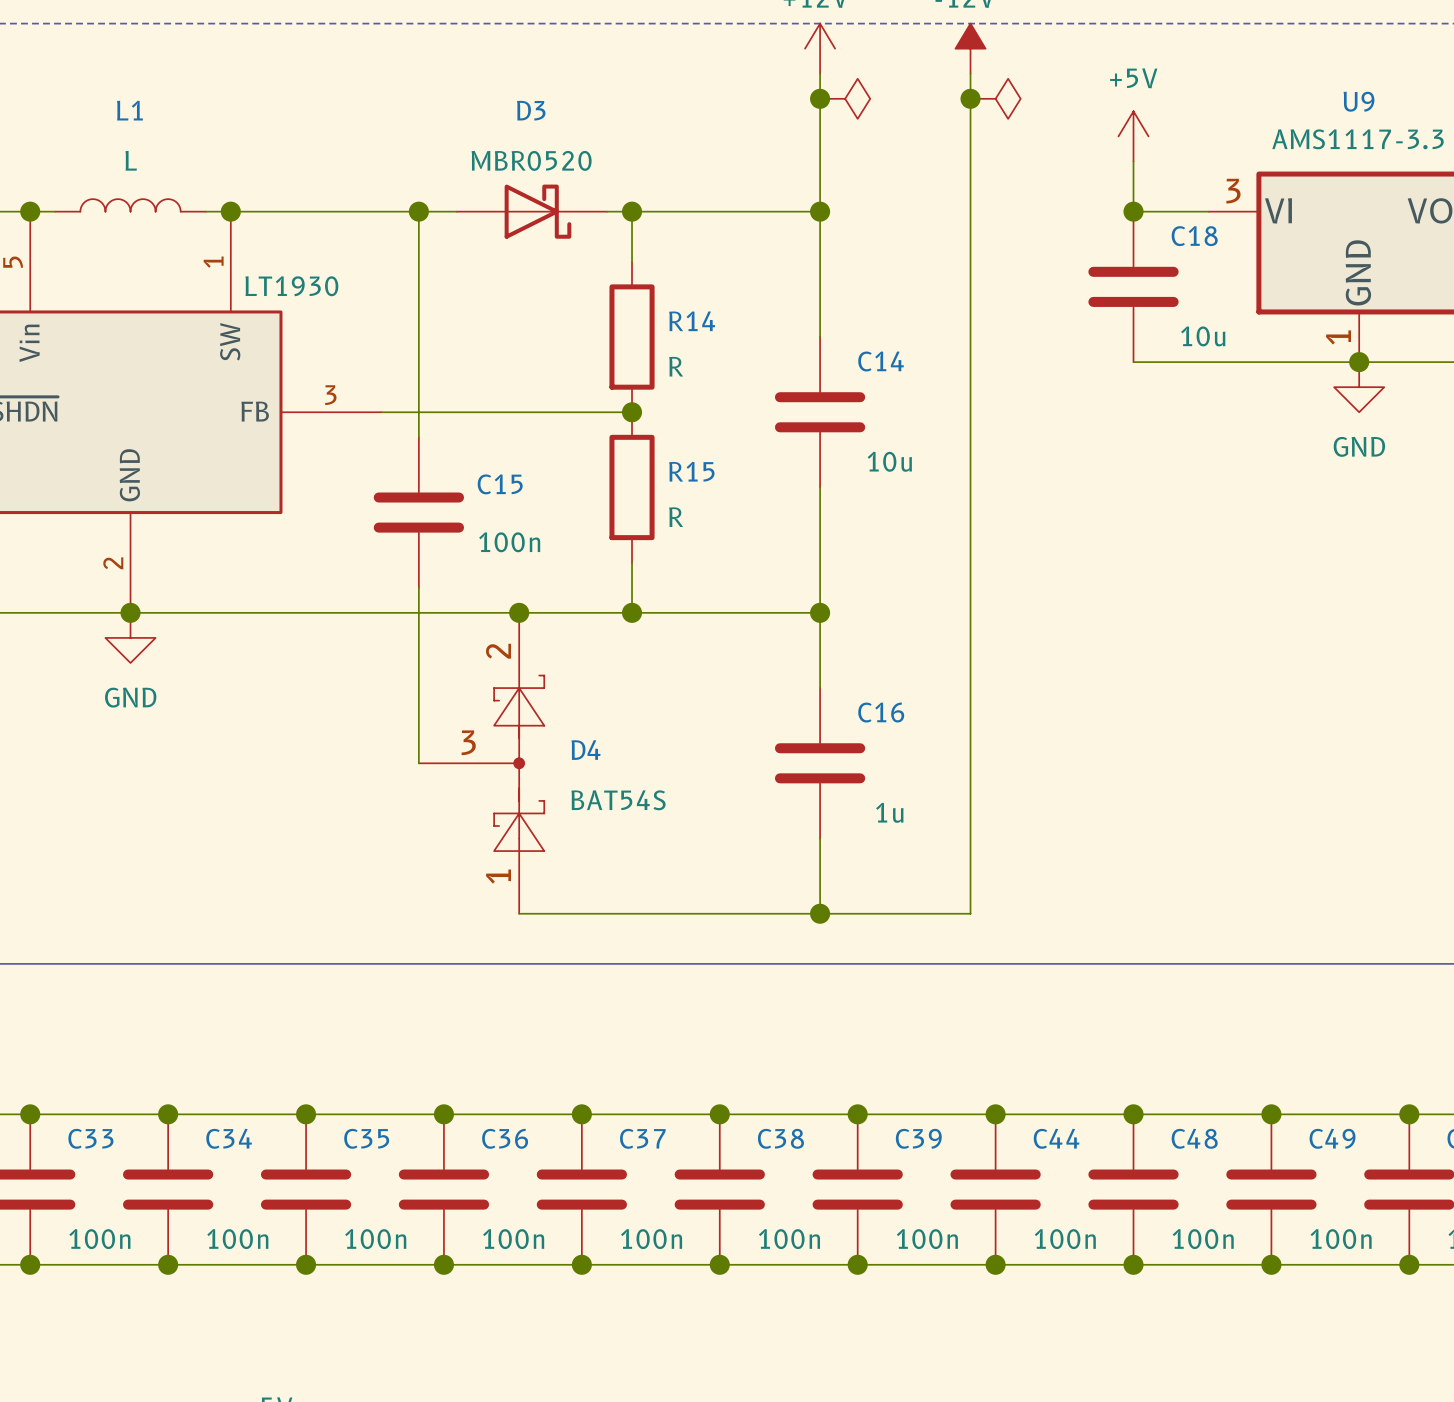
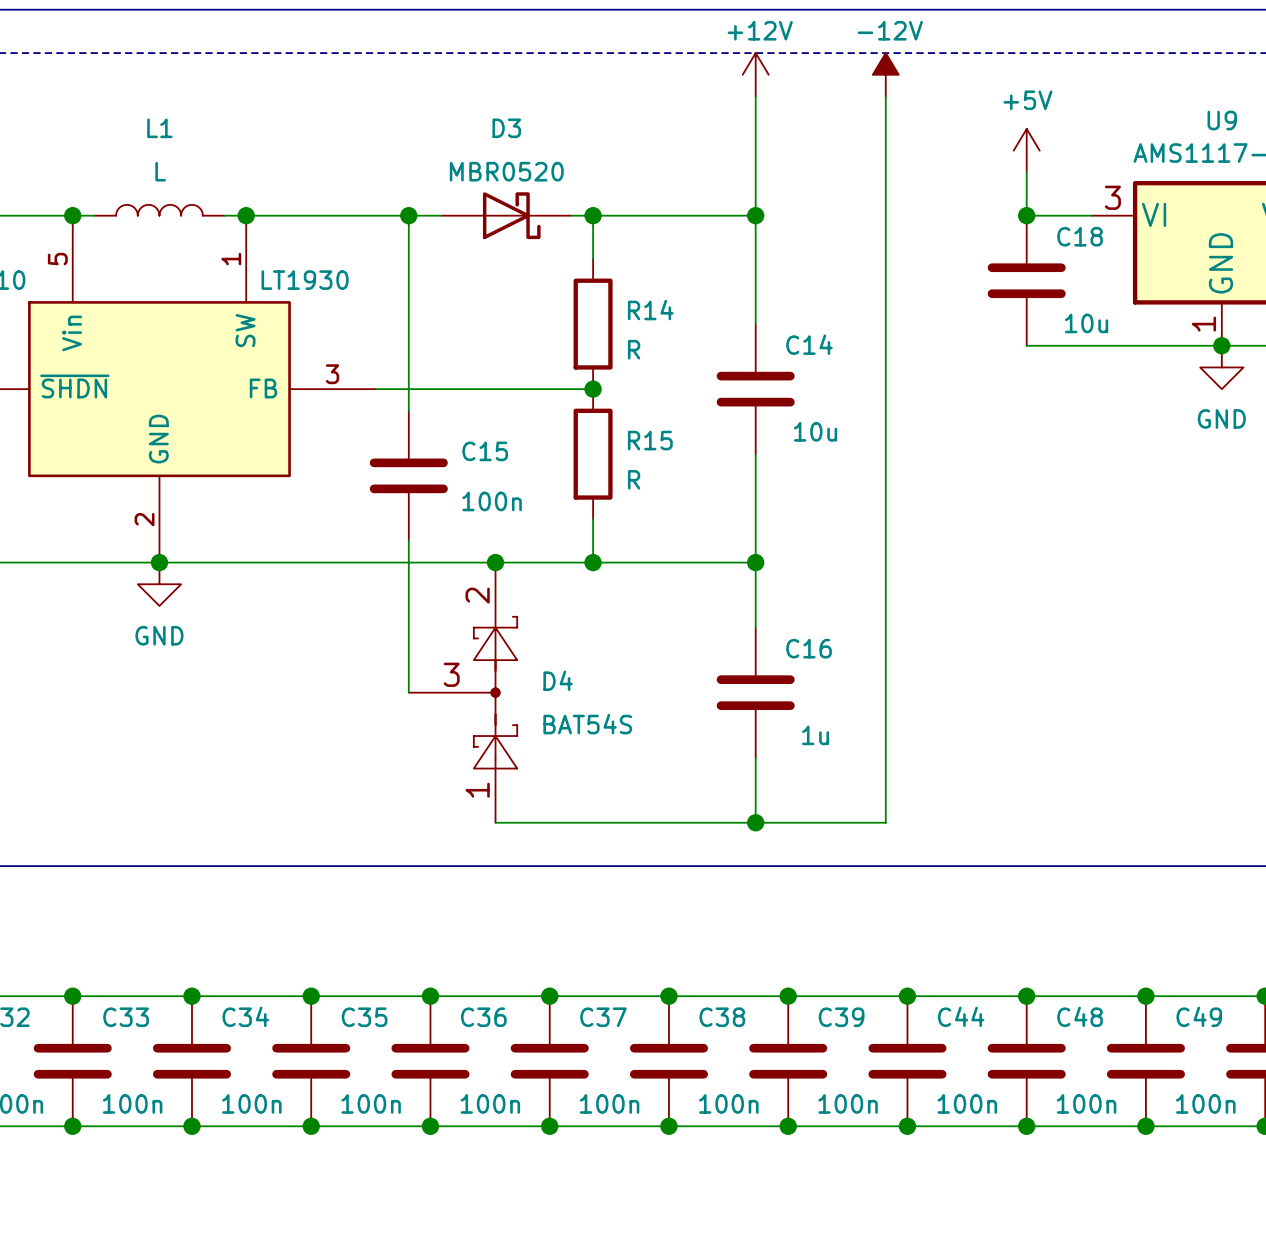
junction: (820, 98) -> none
power symbol: (845, 98) -> none
junction: (970, 98) -> none
power symbol: (995, 98) -> none

